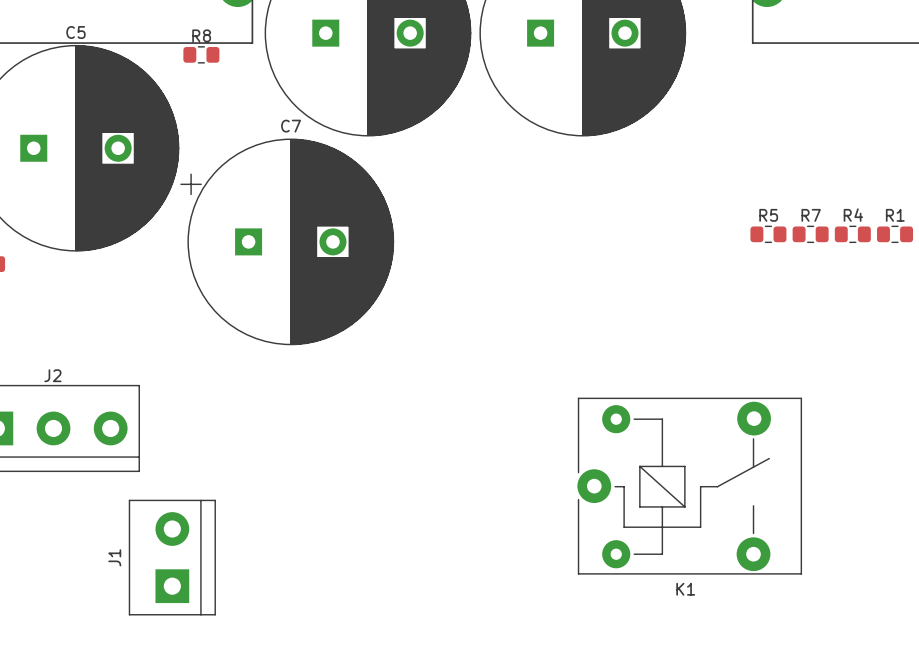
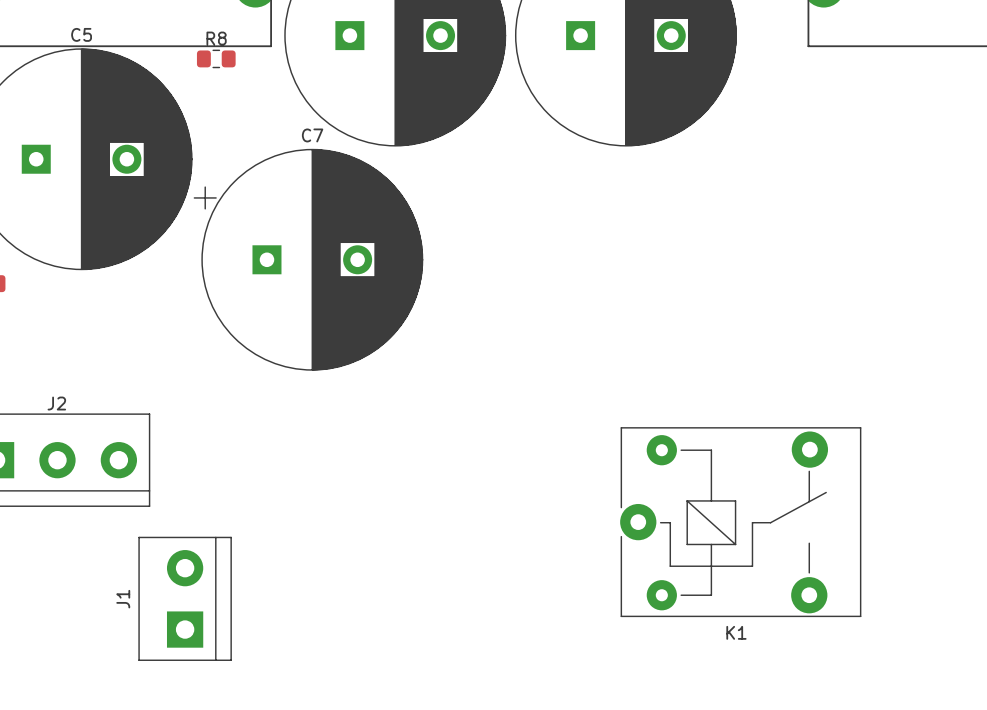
R5: (768, 234) -> none
R7: (810, 234) -> none
R4: (852, 234) -> none
R1: (895, 234) -> none

